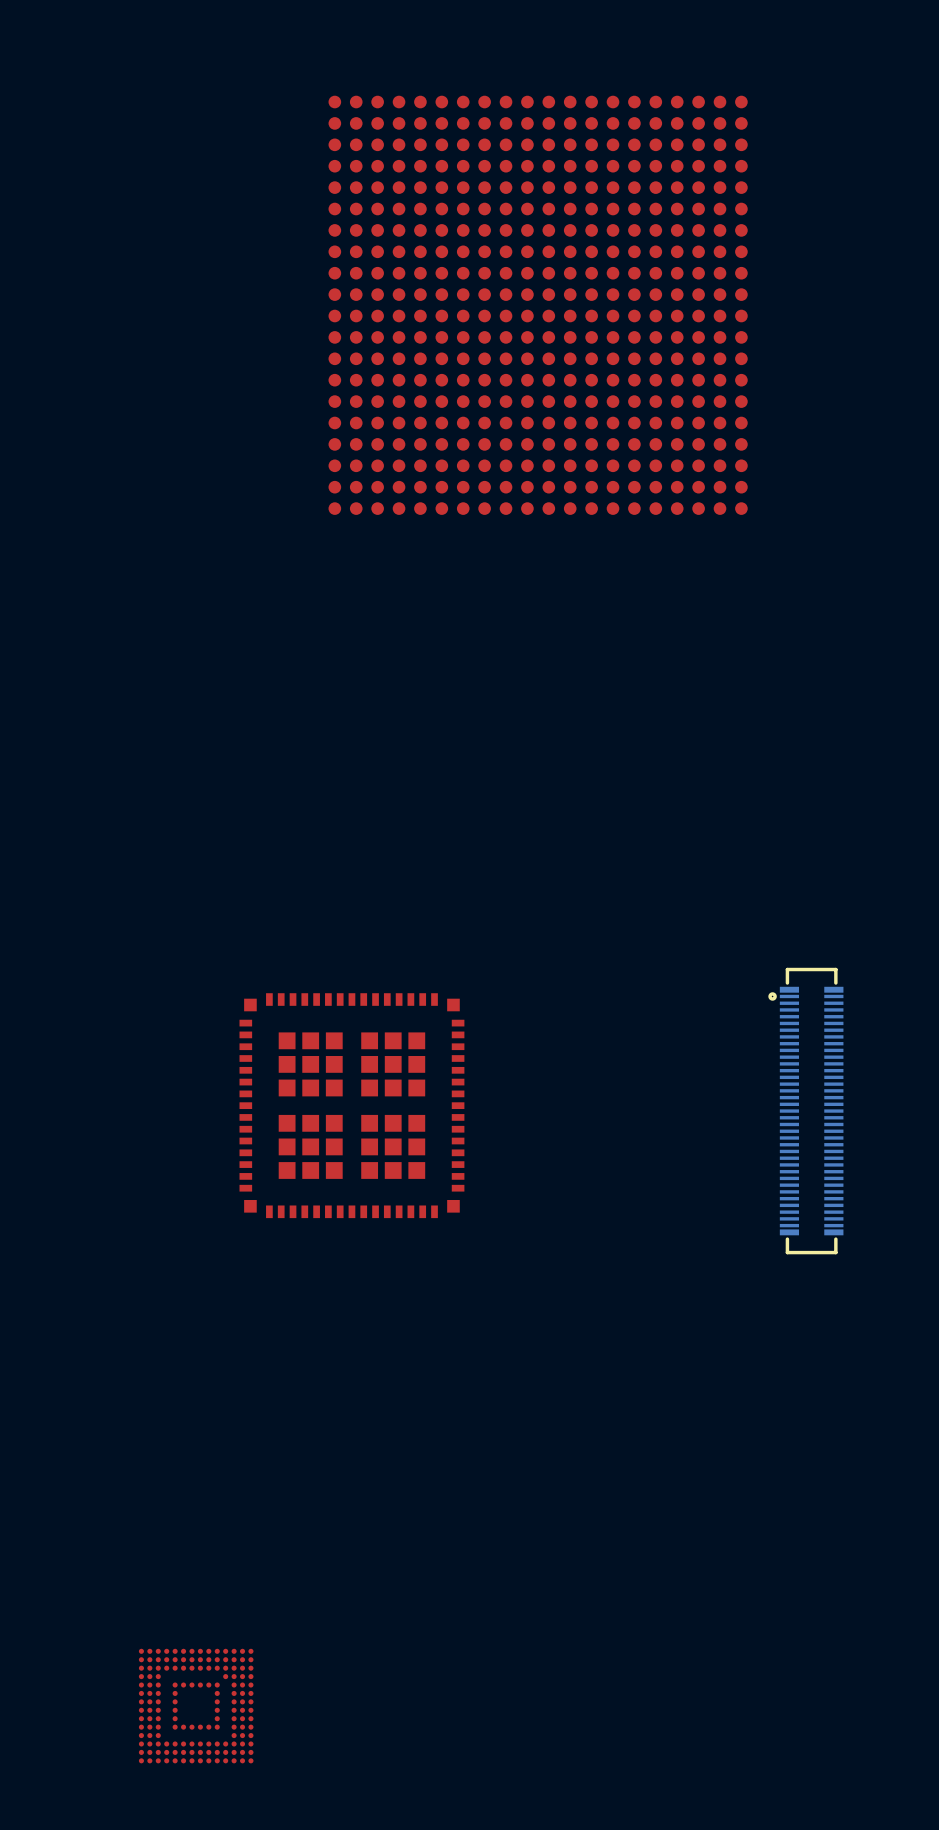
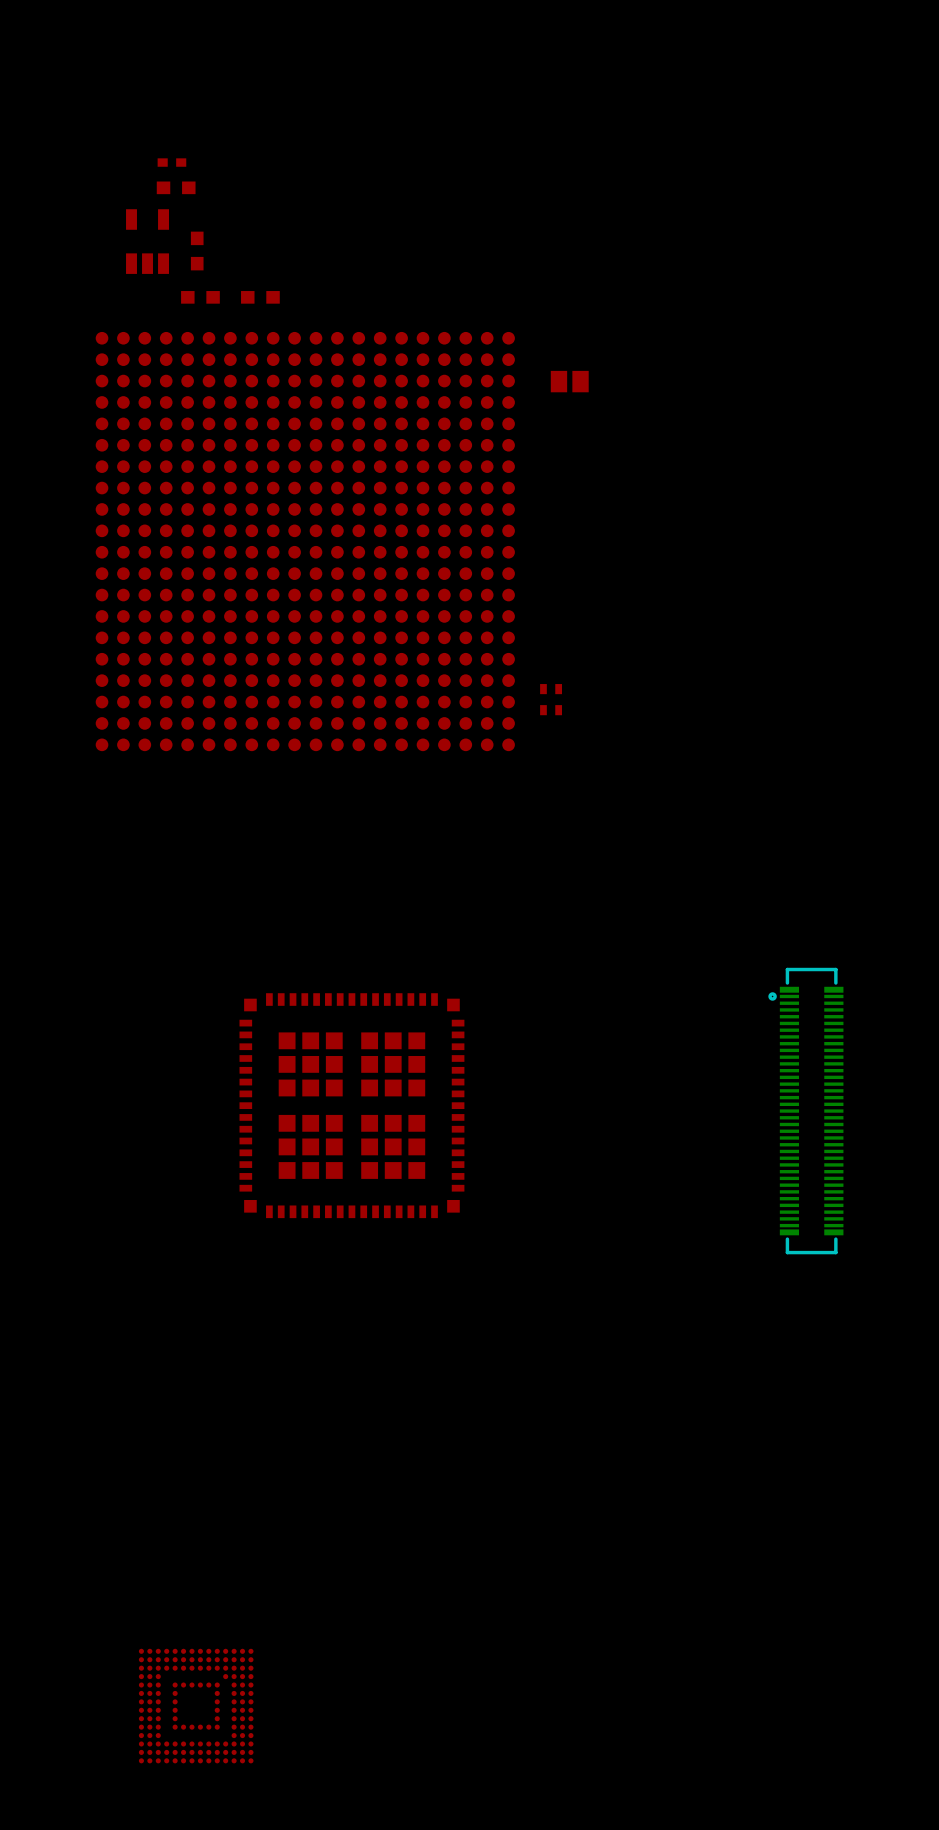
part: none -> (171, 162)
part: none -> (176, 187)
part: none -> (147, 241)
part: none -> (197, 251)
part: none -> (200, 297)
part: none -> (260, 297)
part position: (538, 305) -> (305, 541)
part: none -> (569, 381)
part: none -> (551, 689)
part: none -> (551, 710)

